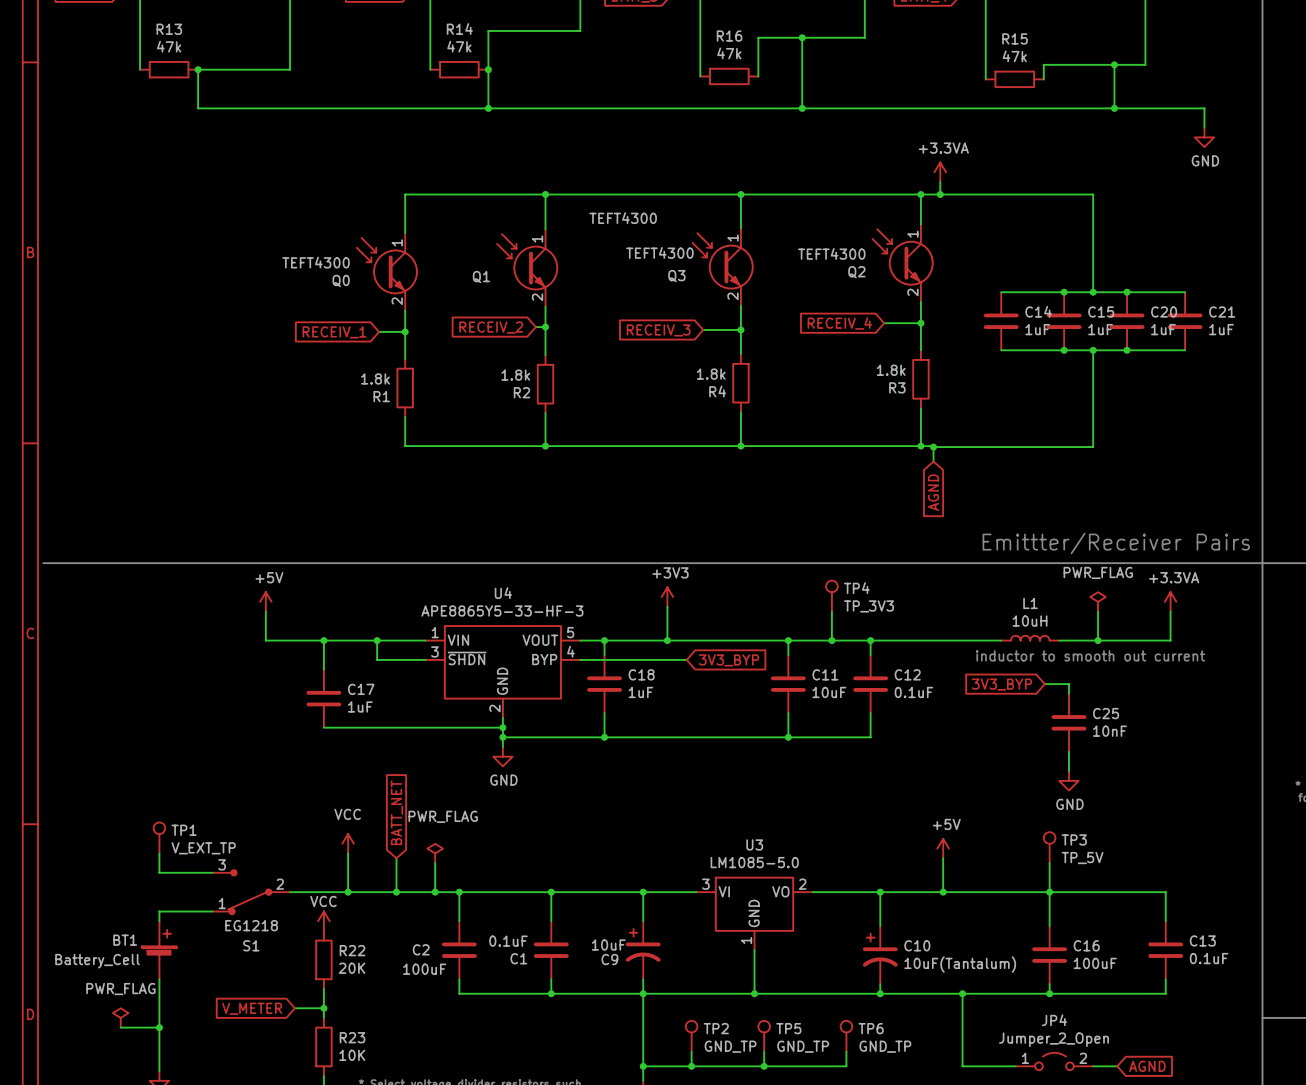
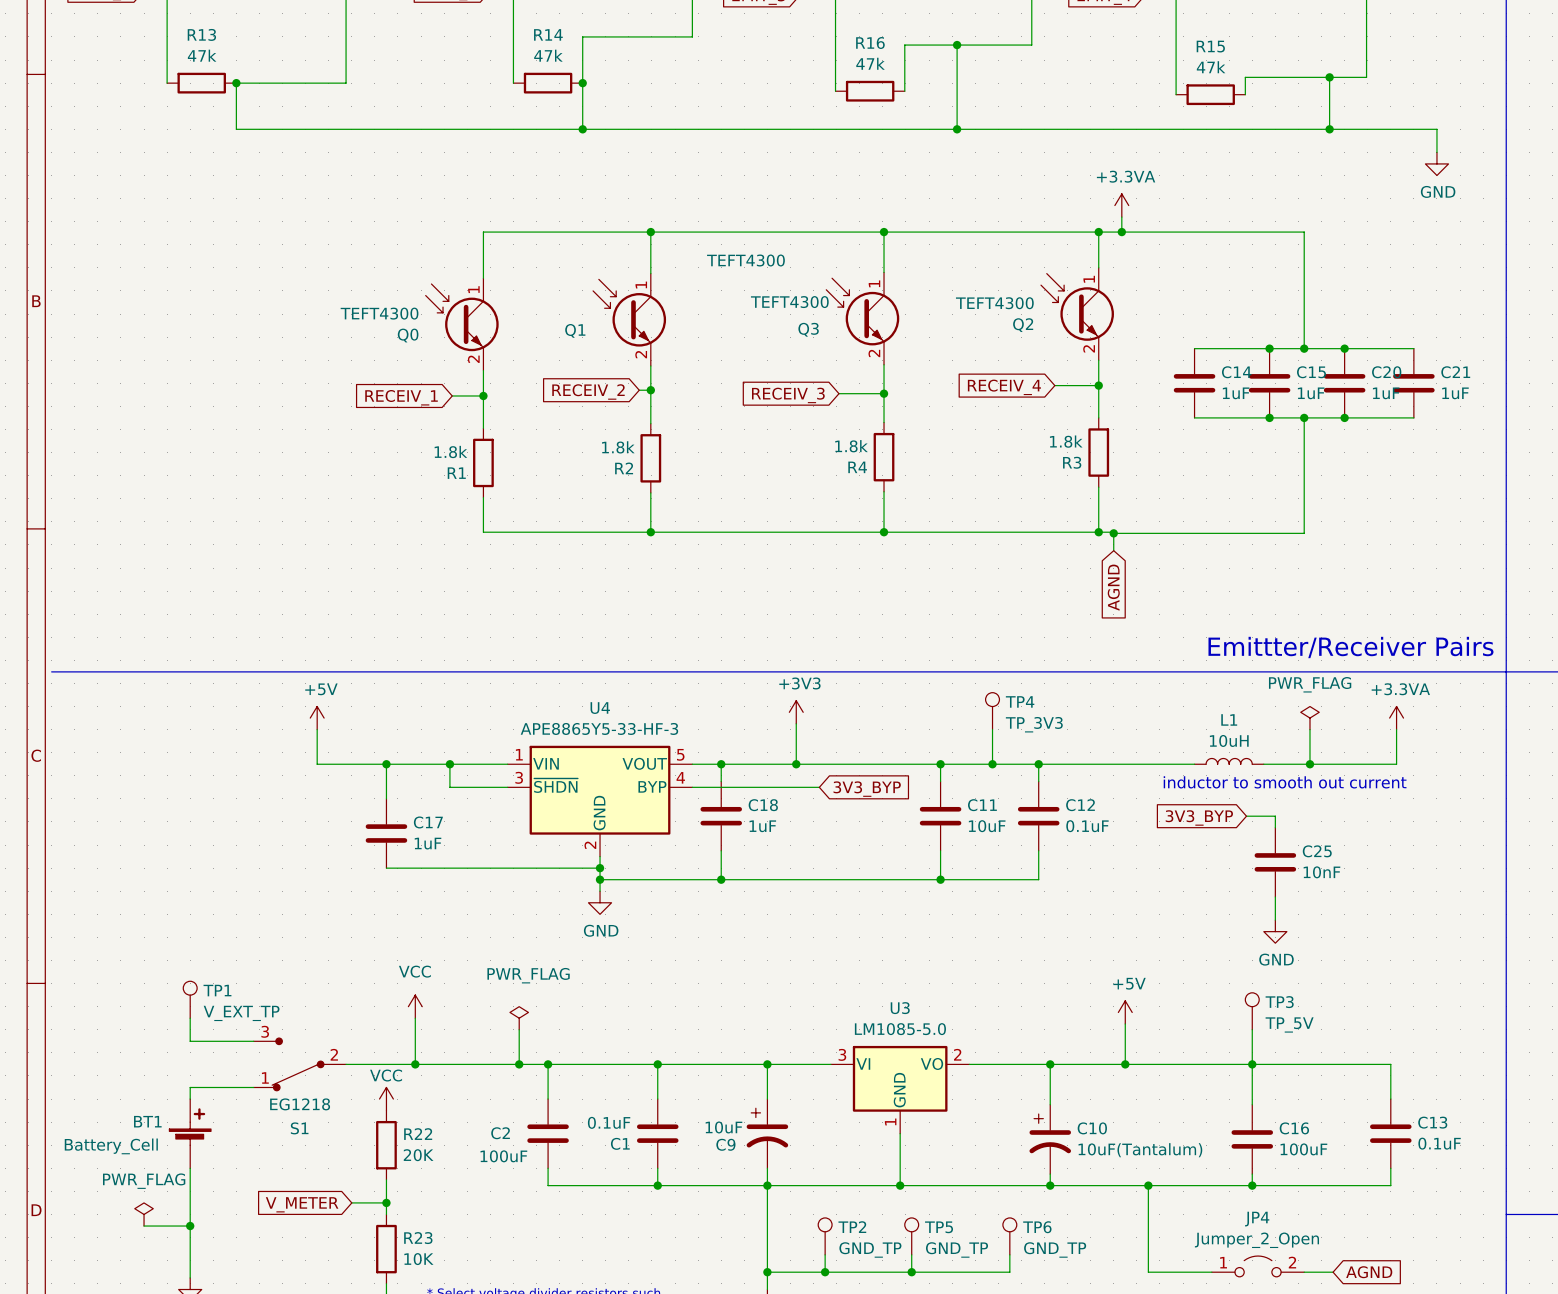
global label: BATT_NET (396, 812) -> none
wire: (396, 858) (396, 892) -> none
junction: (396, 892) -> none

